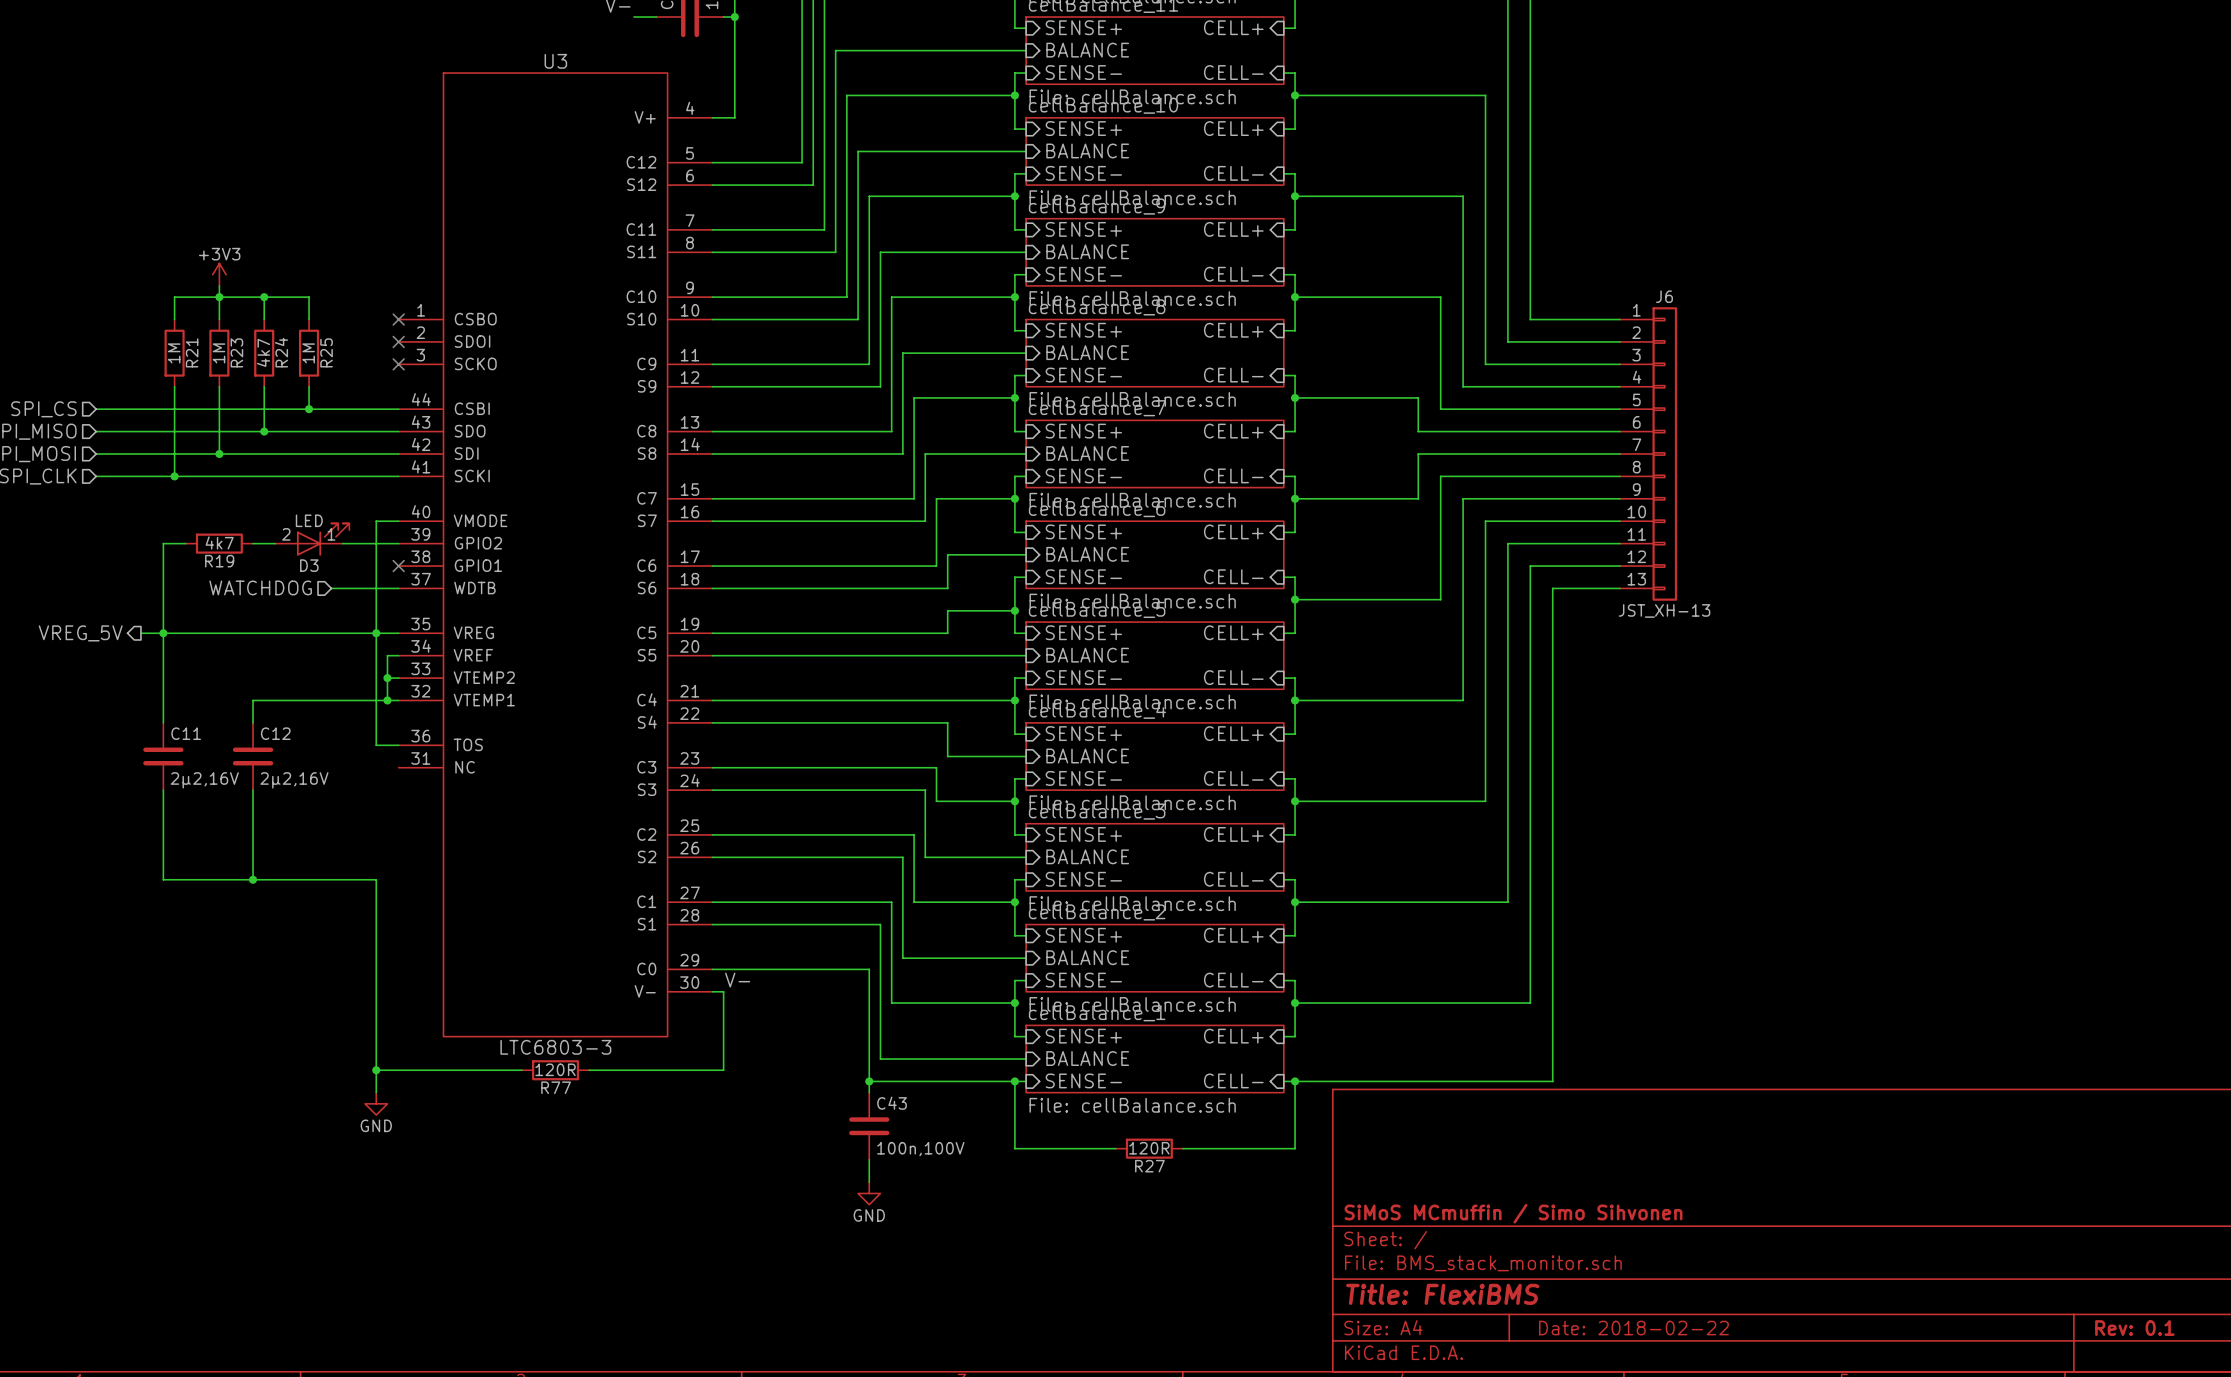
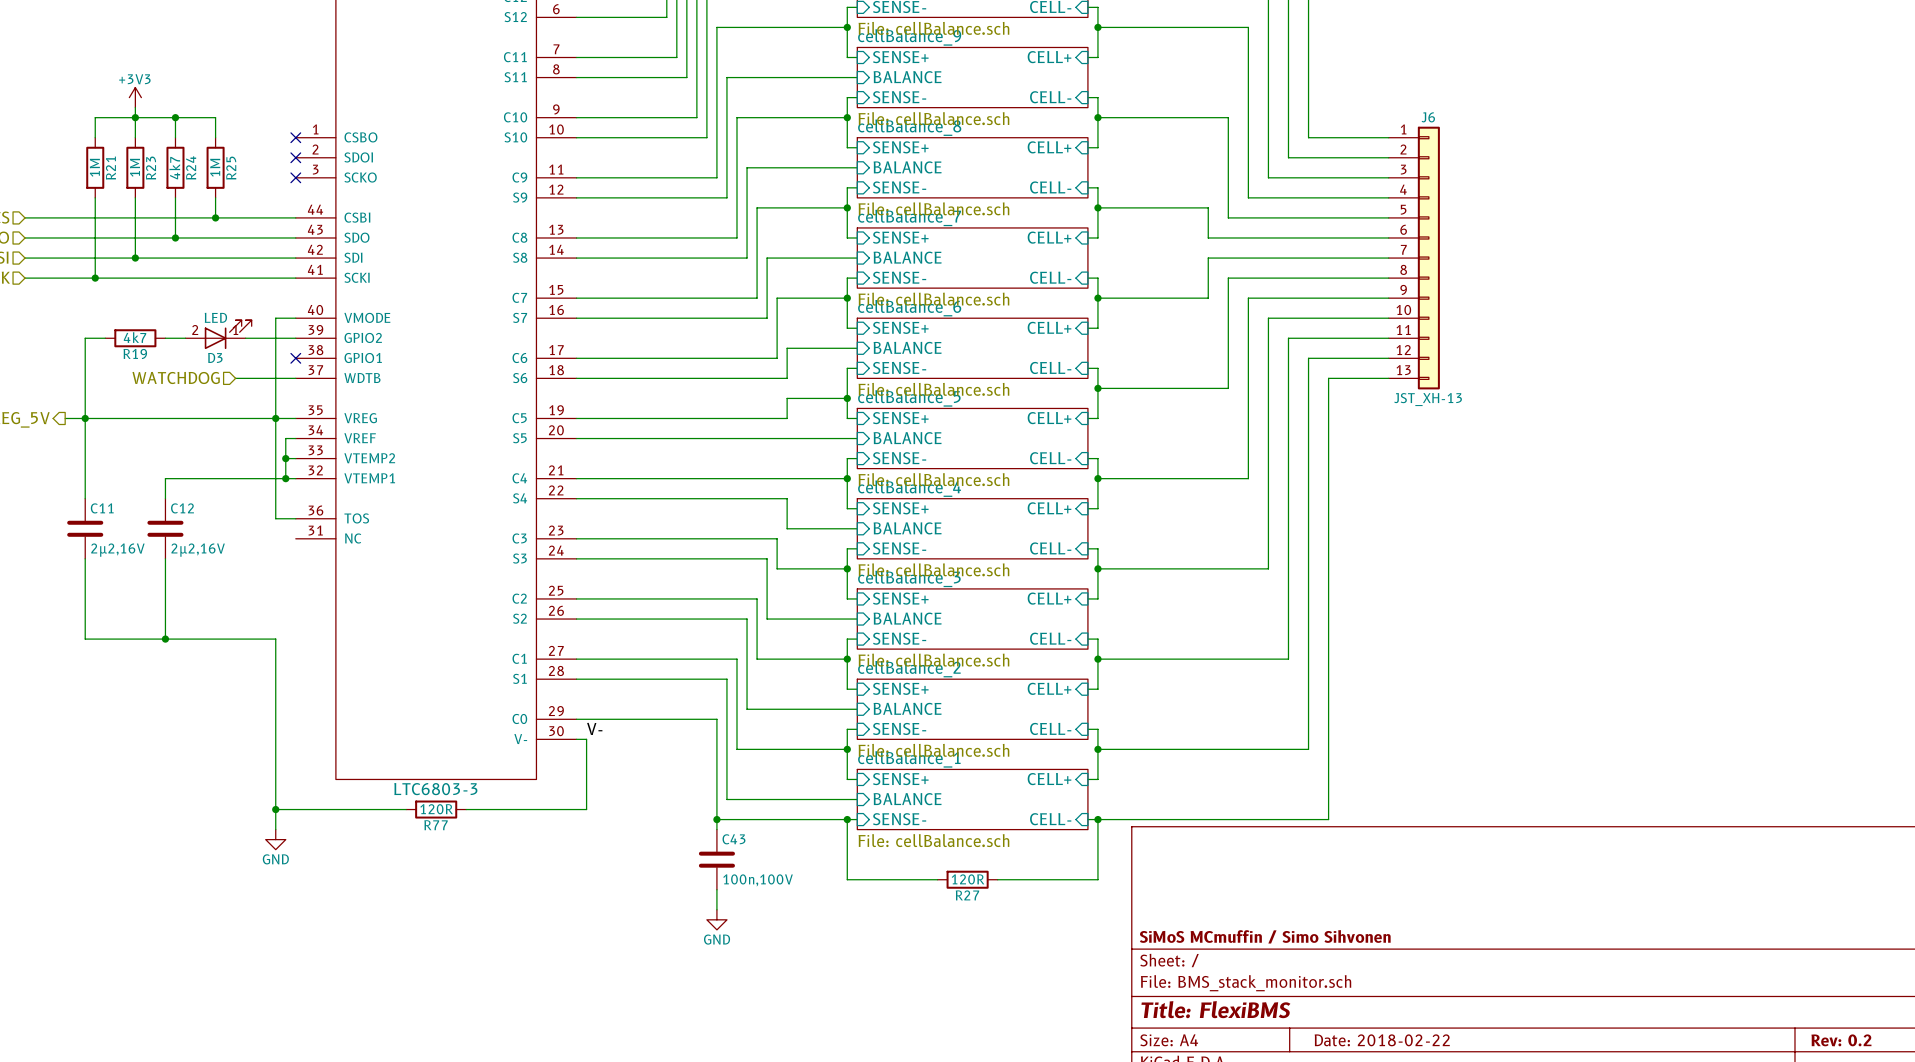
title block: Rev: 0.1 (2134, 1328) -> Rev: 0.2 (1841, 1040)

